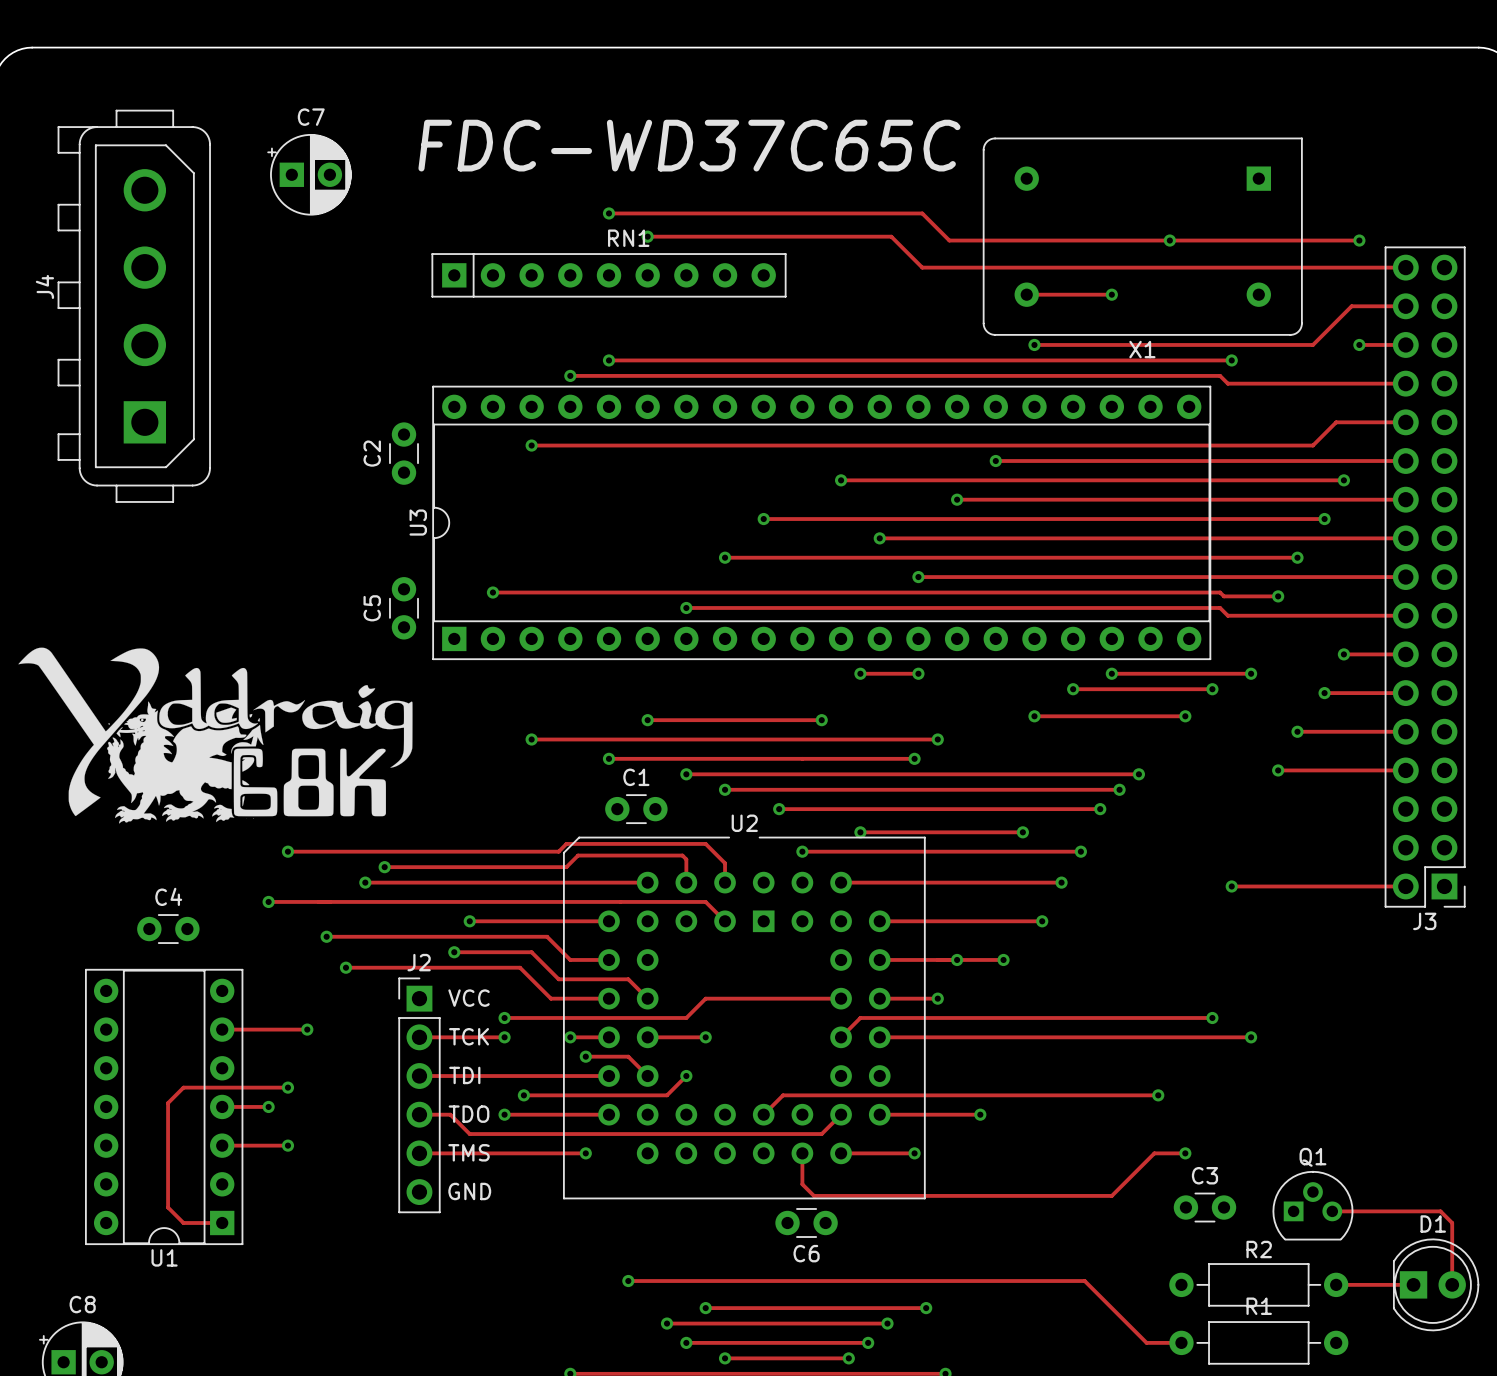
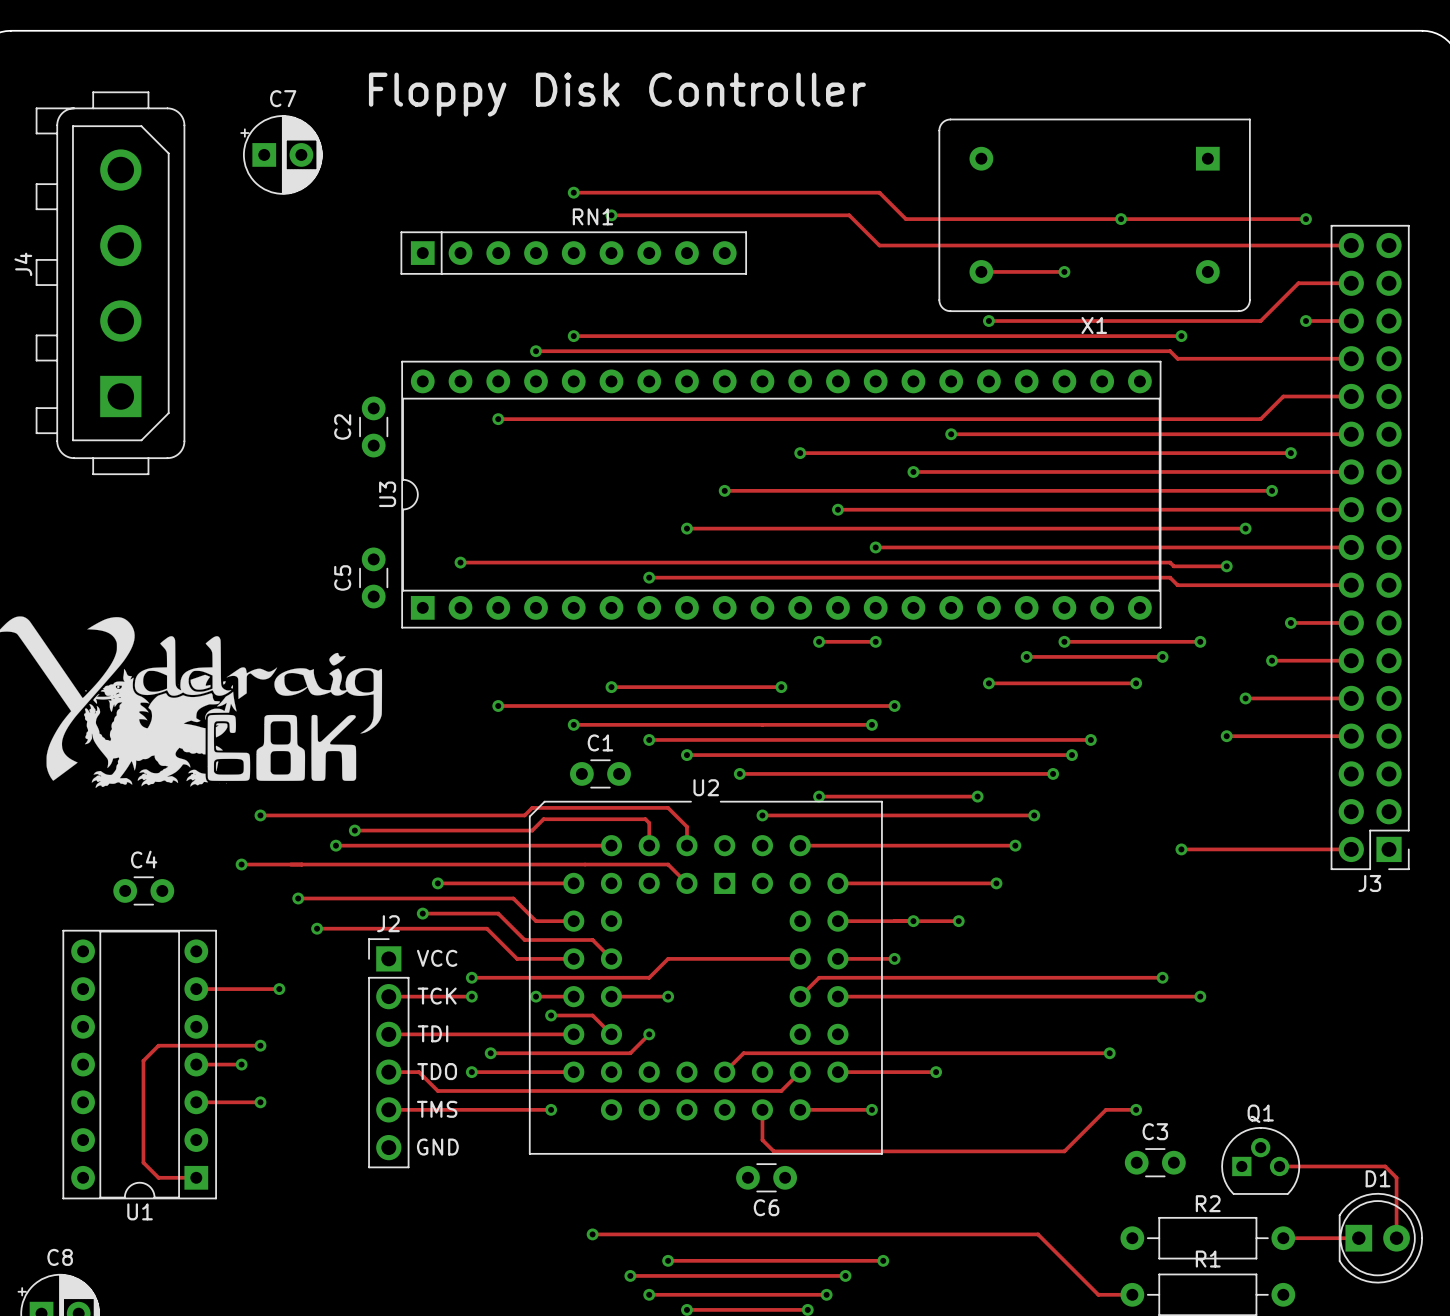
text: none -> Floppy Disk Controller (617, 94)
text: FDC-WD37C65C (689, 145) -> none

